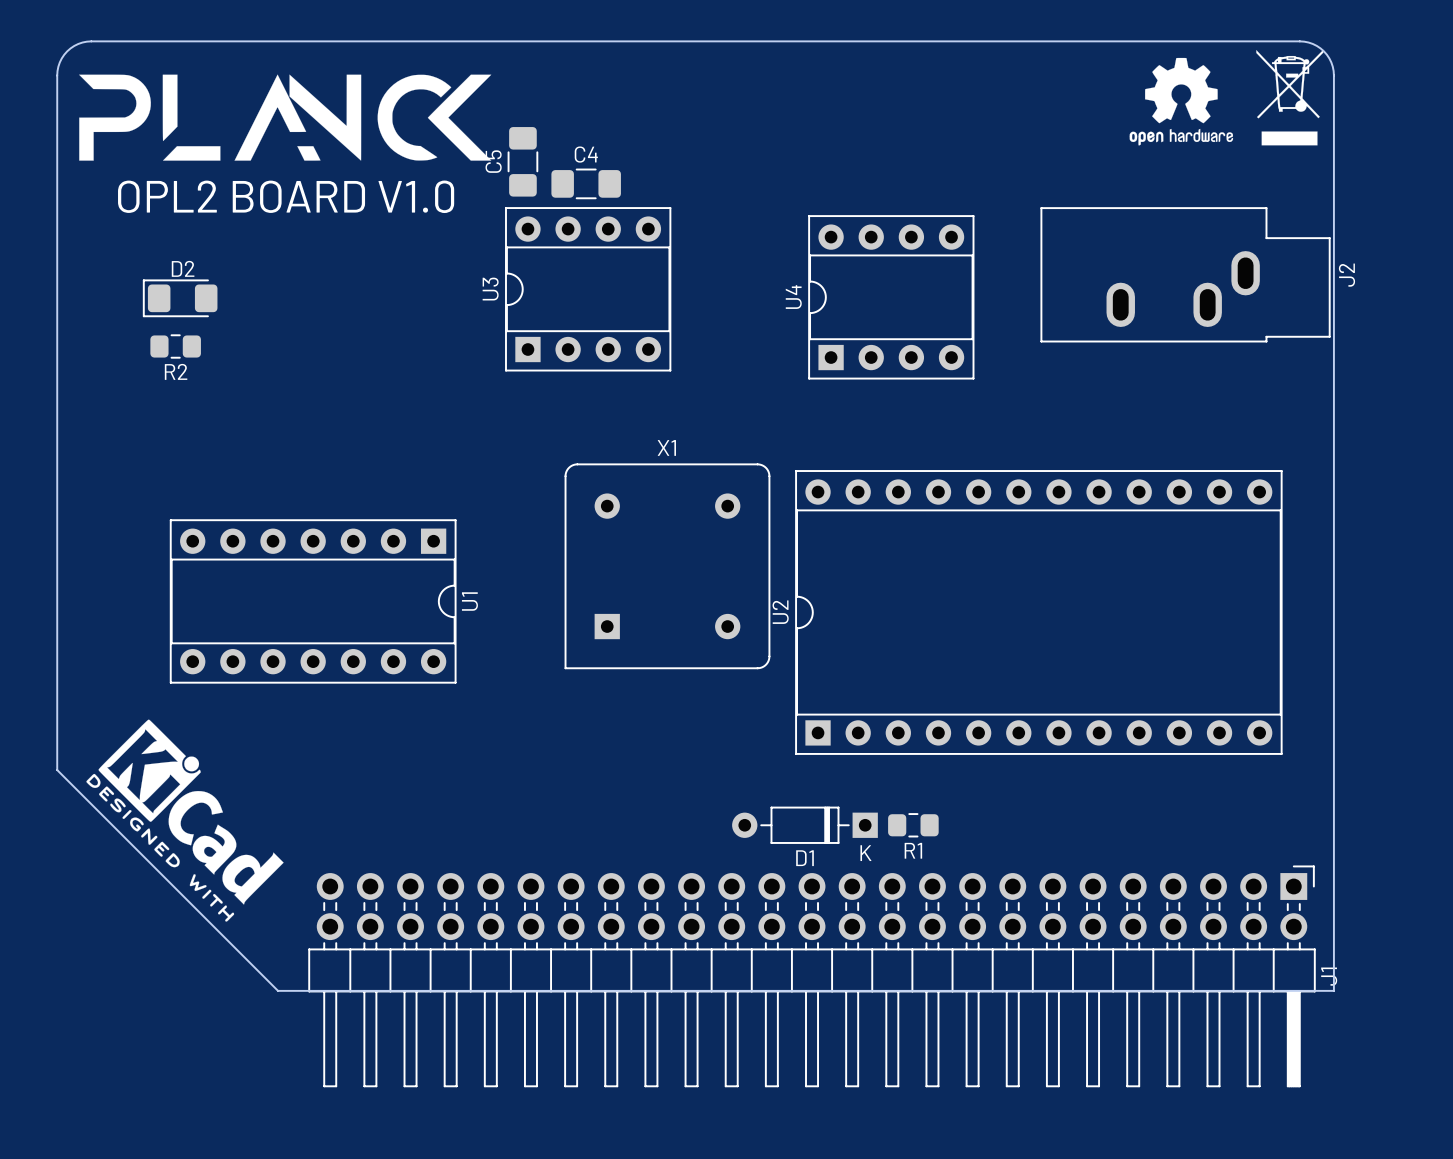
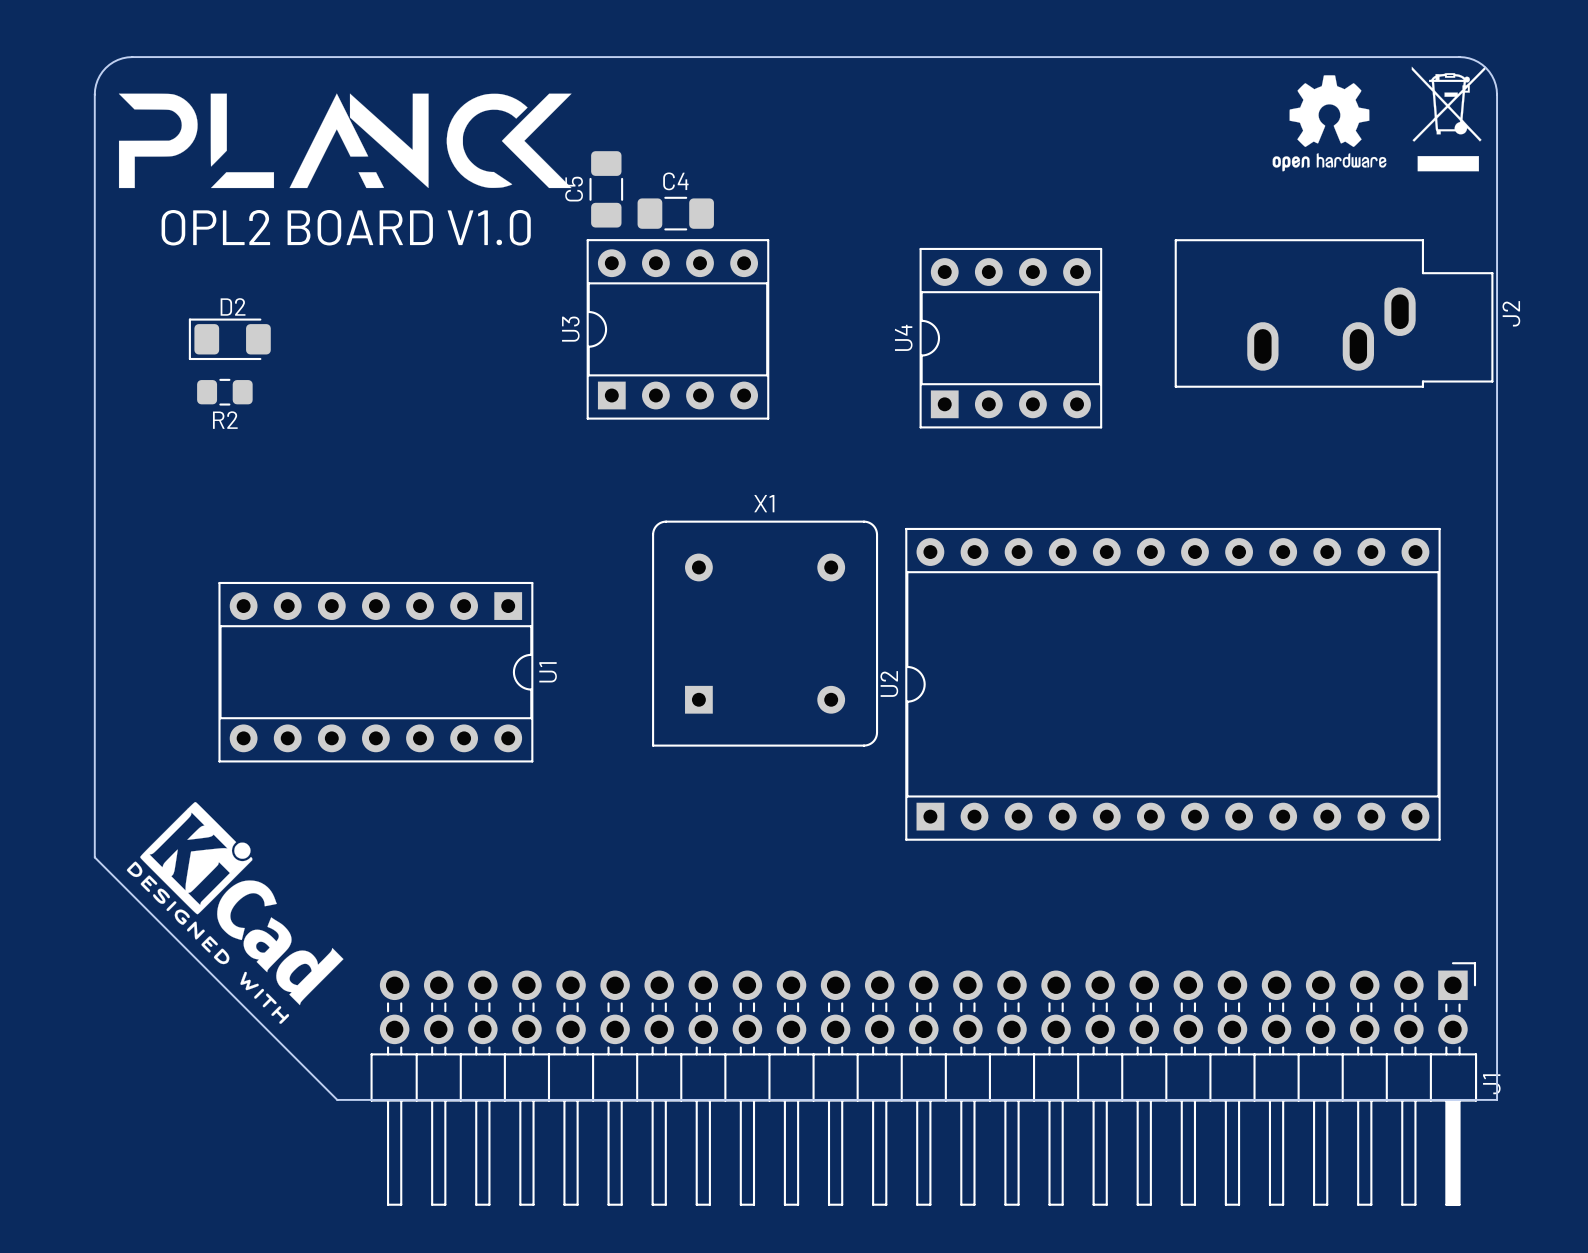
D1: (804, 825) -> none
R1: (913, 825) -> none

